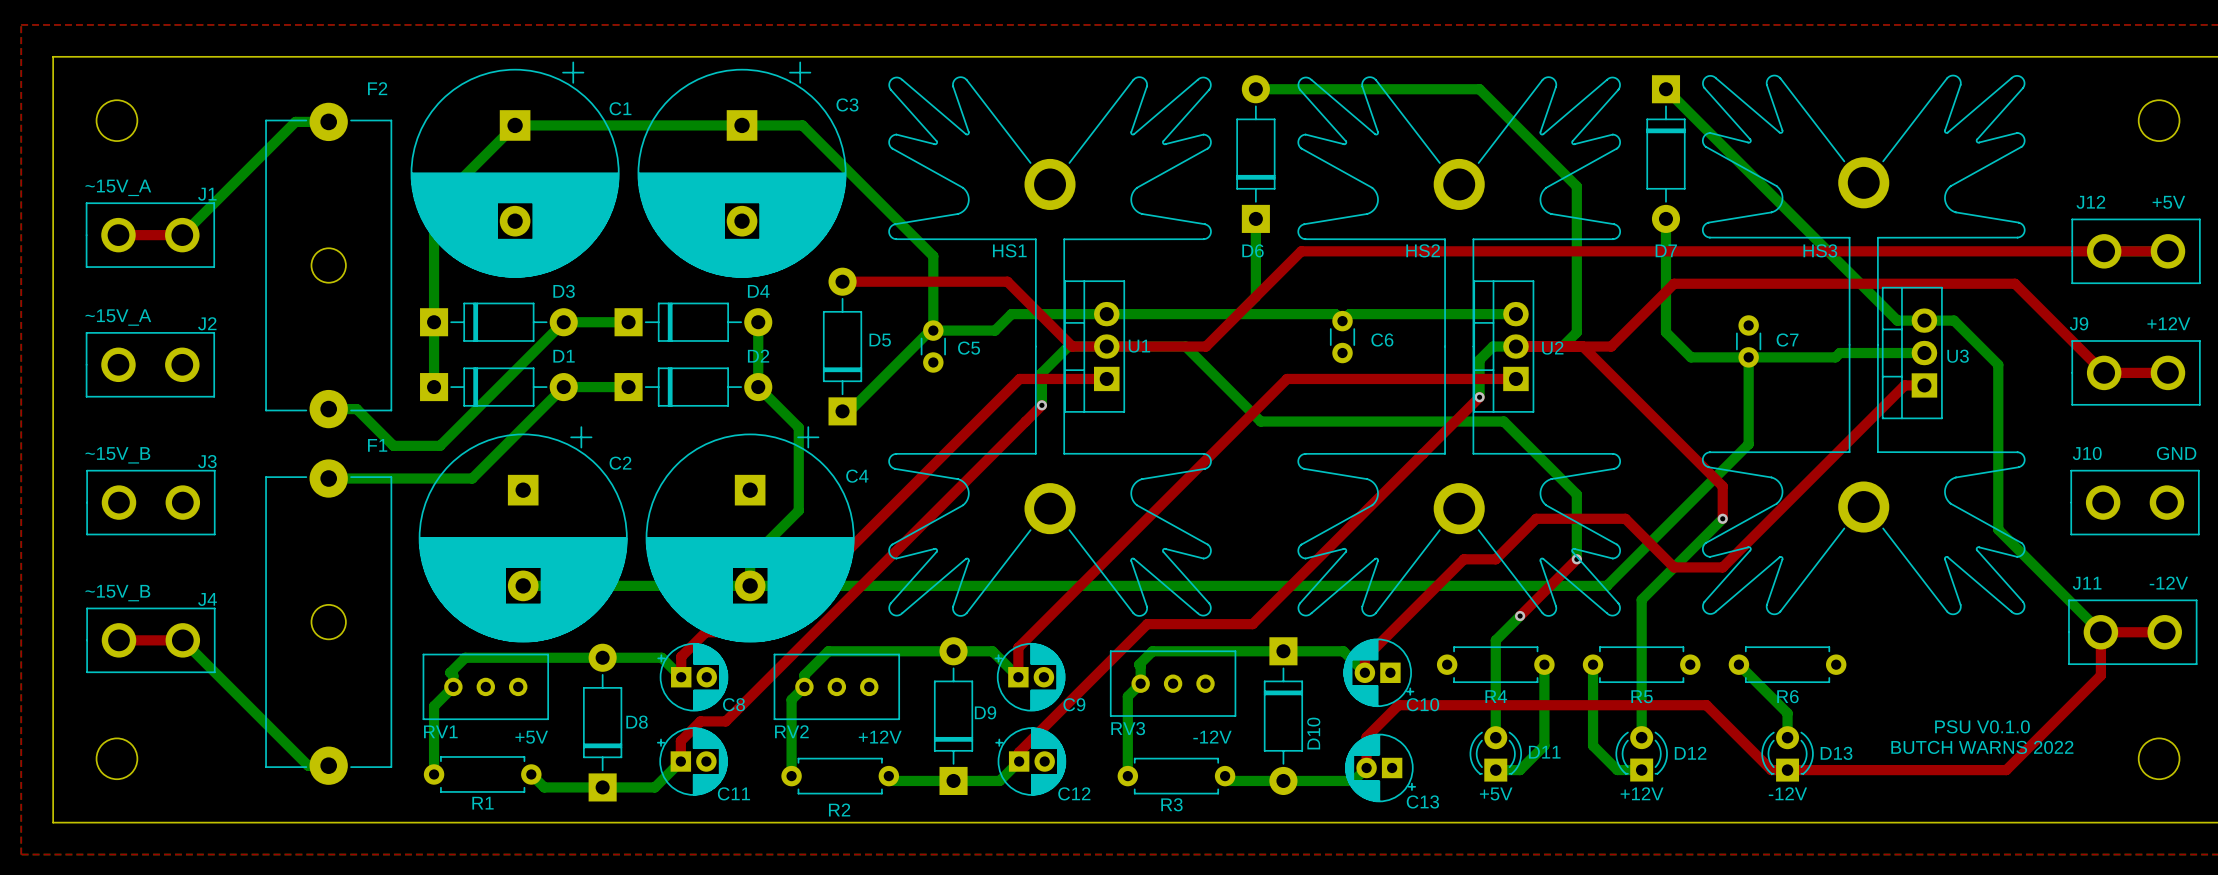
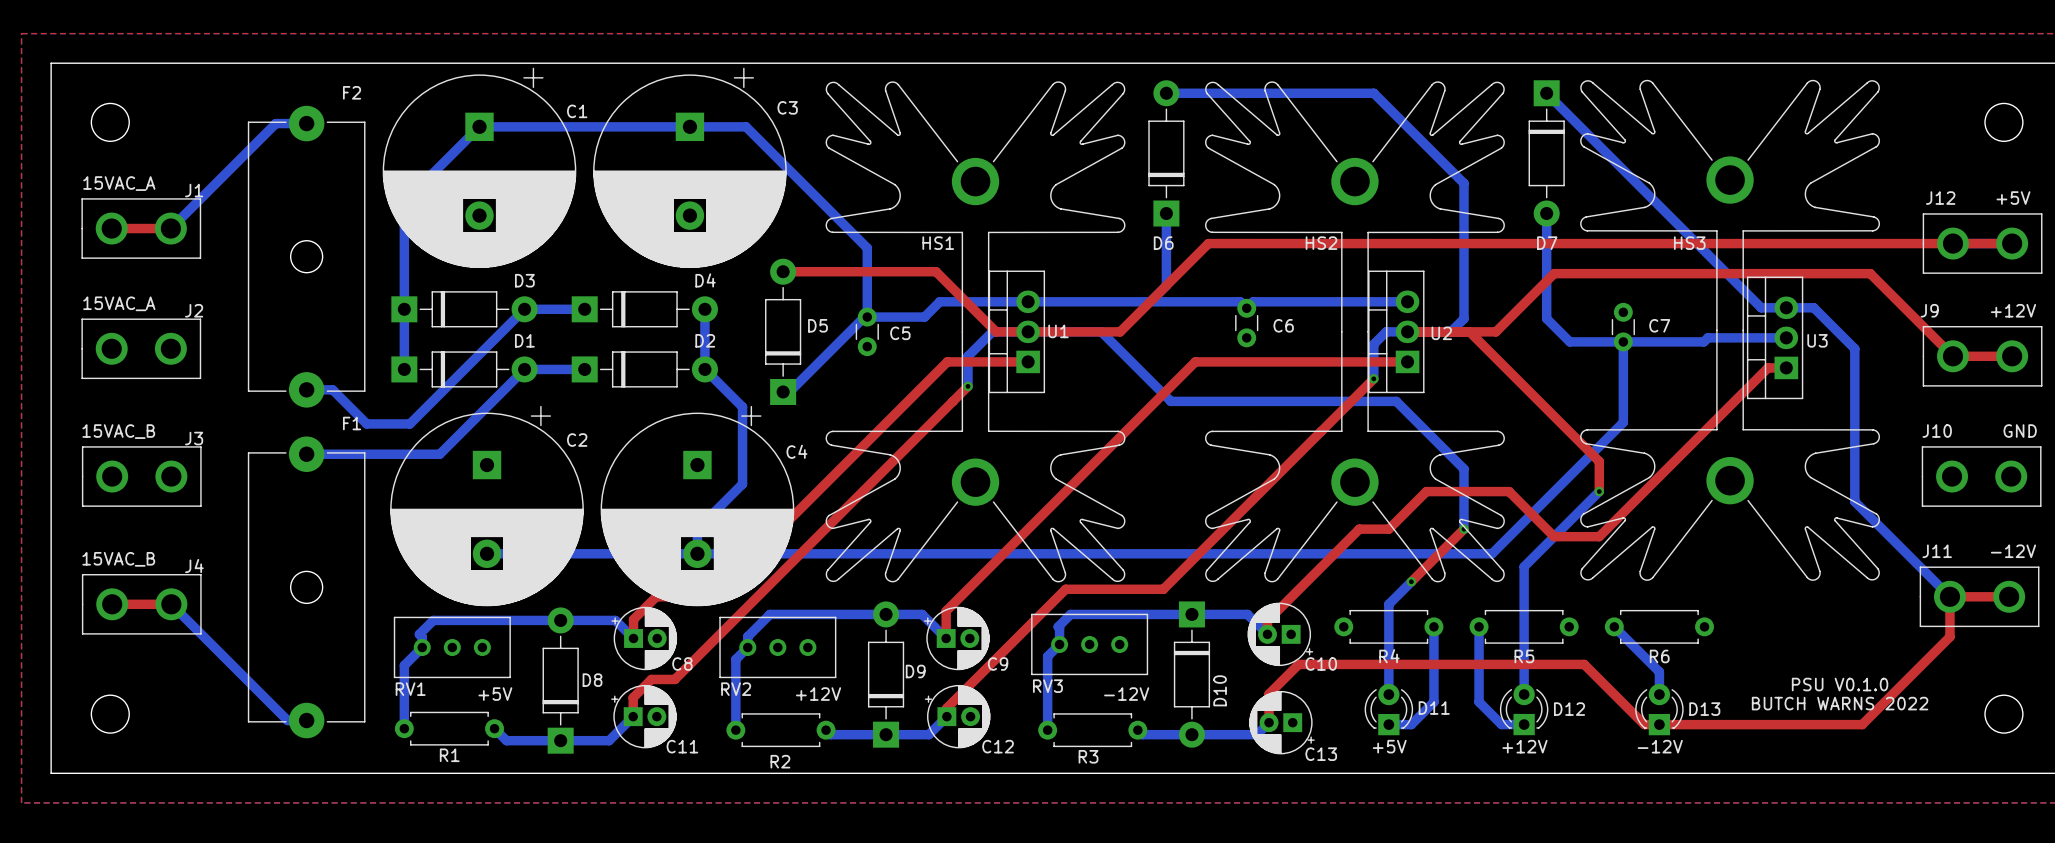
text: ~15V_A (118, 187) -> 15VAC_A (119, 183)
text: ~15V_A (118, 317) -> 15VAC_A (119, 303)
text: ~15V_B (117, 455) -> 15VAC_B (118, 431)
text: ~15V_B (117, 593) -> 15VAC_B (118, 559)

